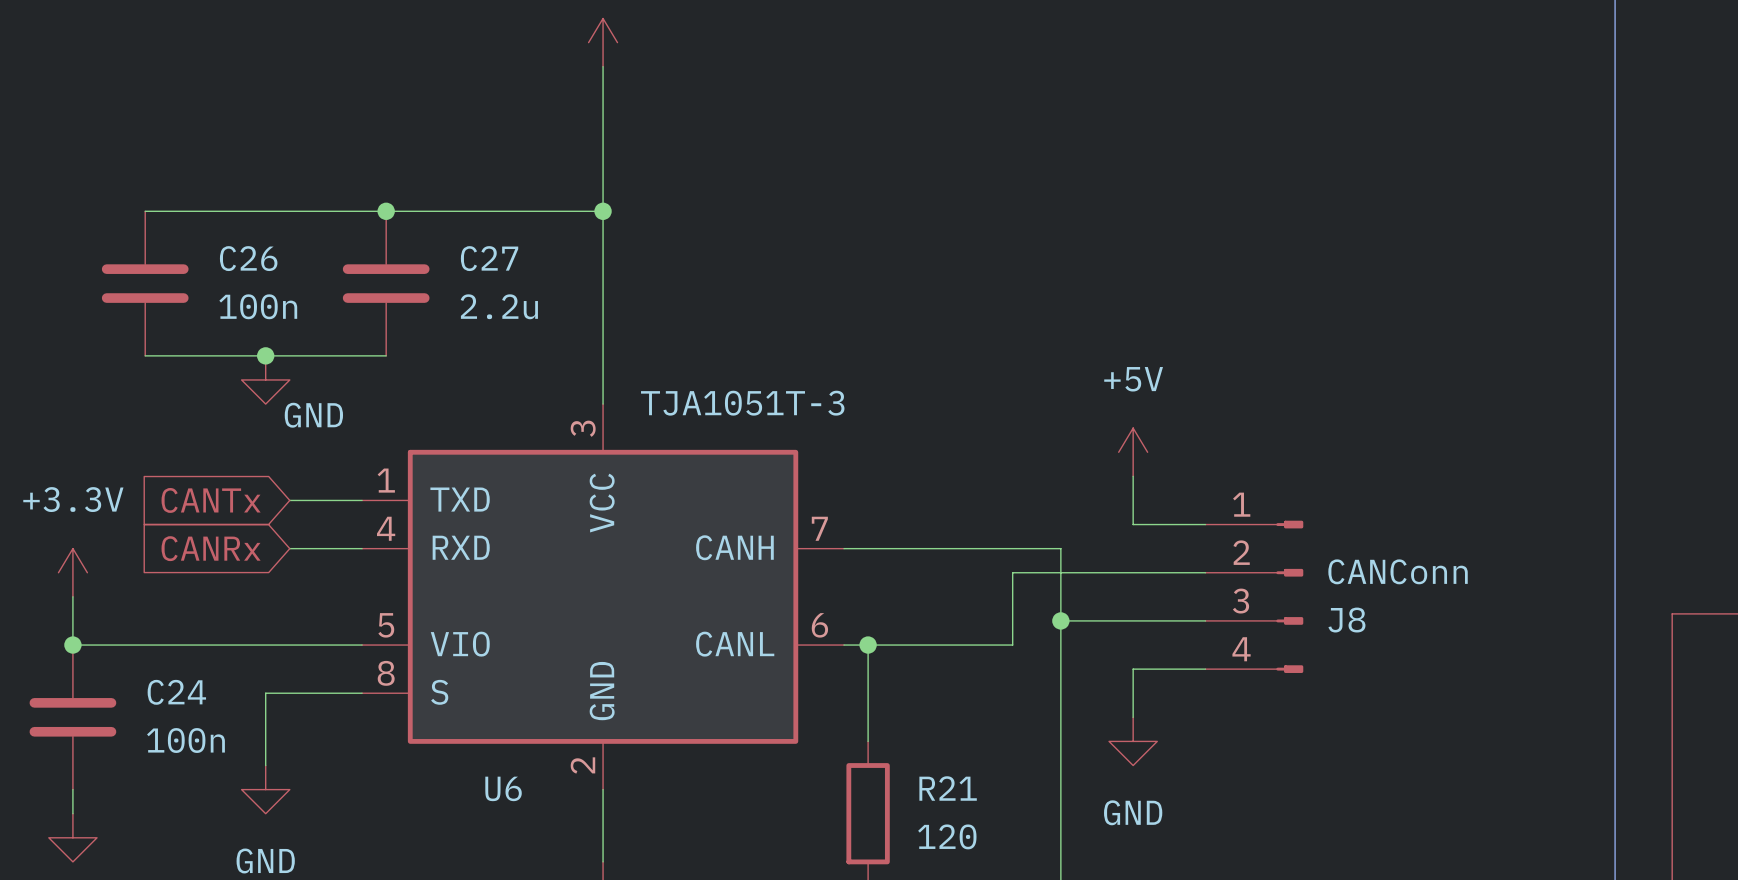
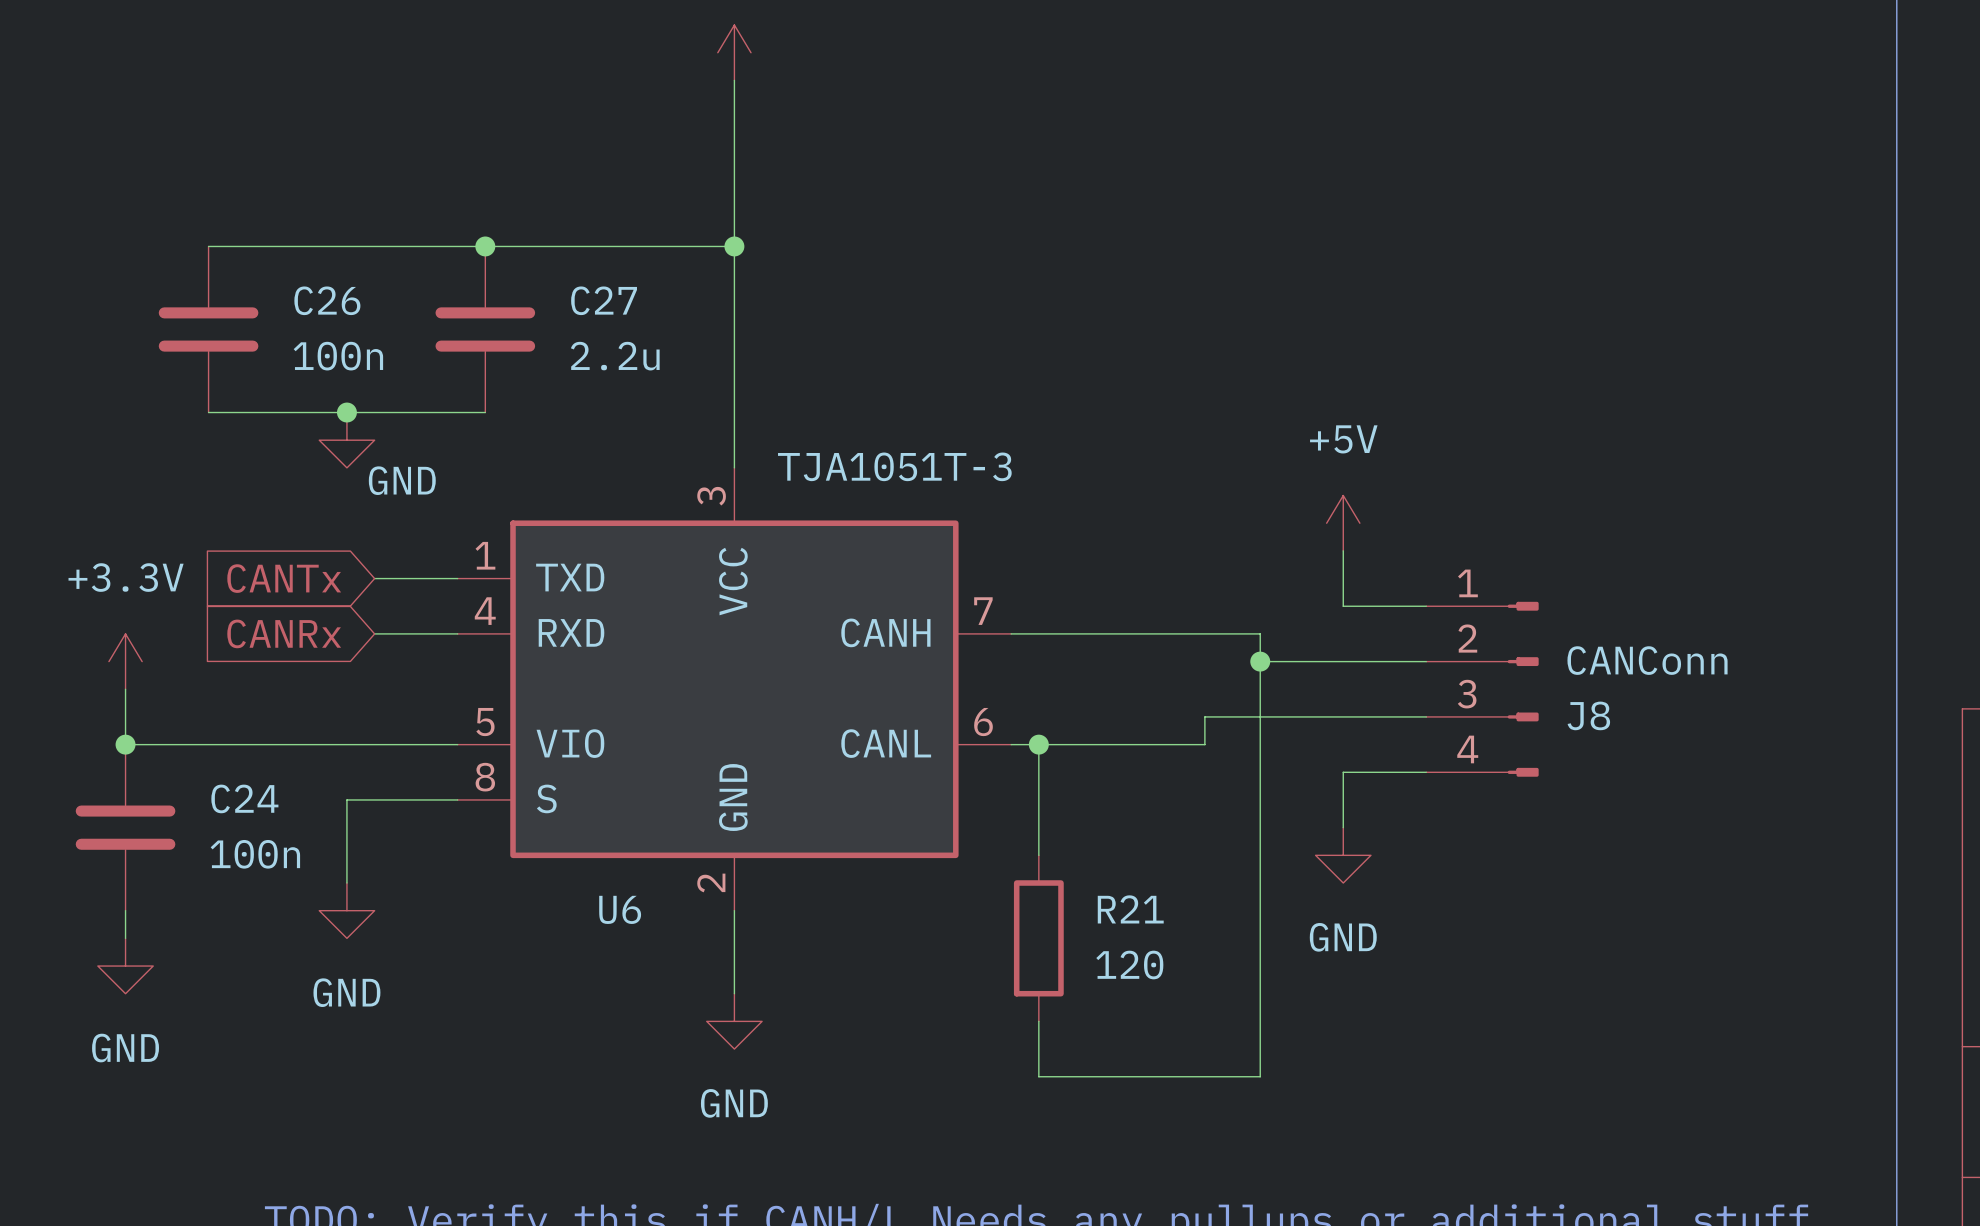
wire: (1060, 572) (1012, 572) (1012, 620) -> (1260, 716) (1204, 716)
junction position: (1060, 620) -> (1260, 661)

